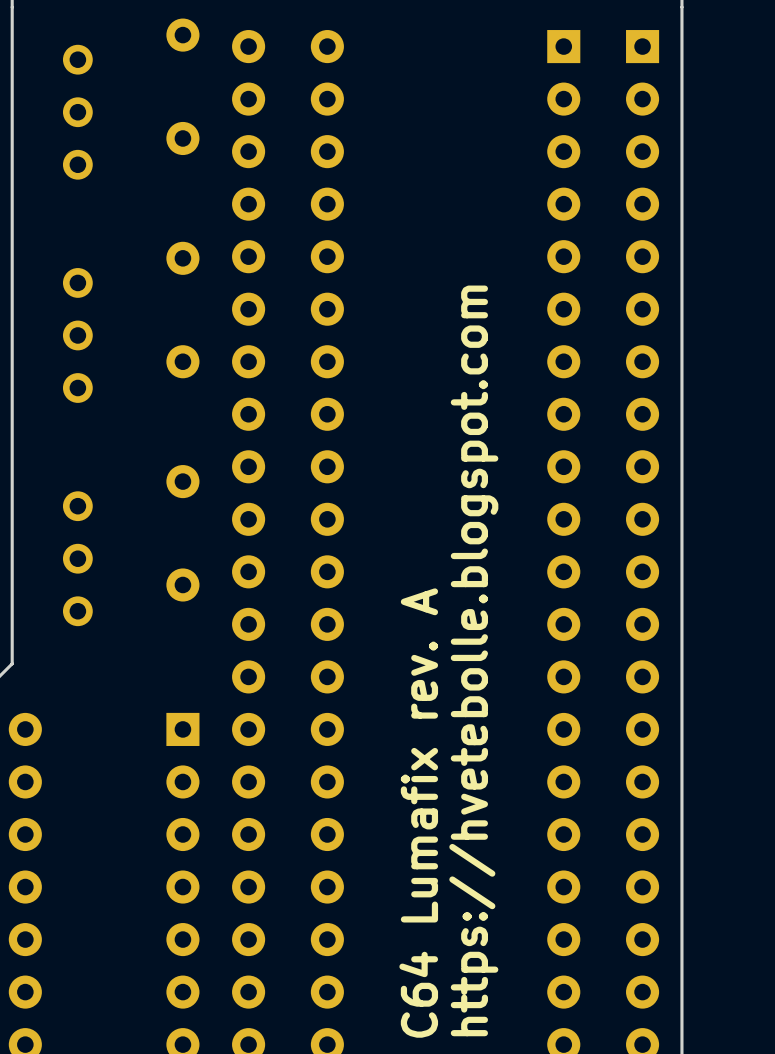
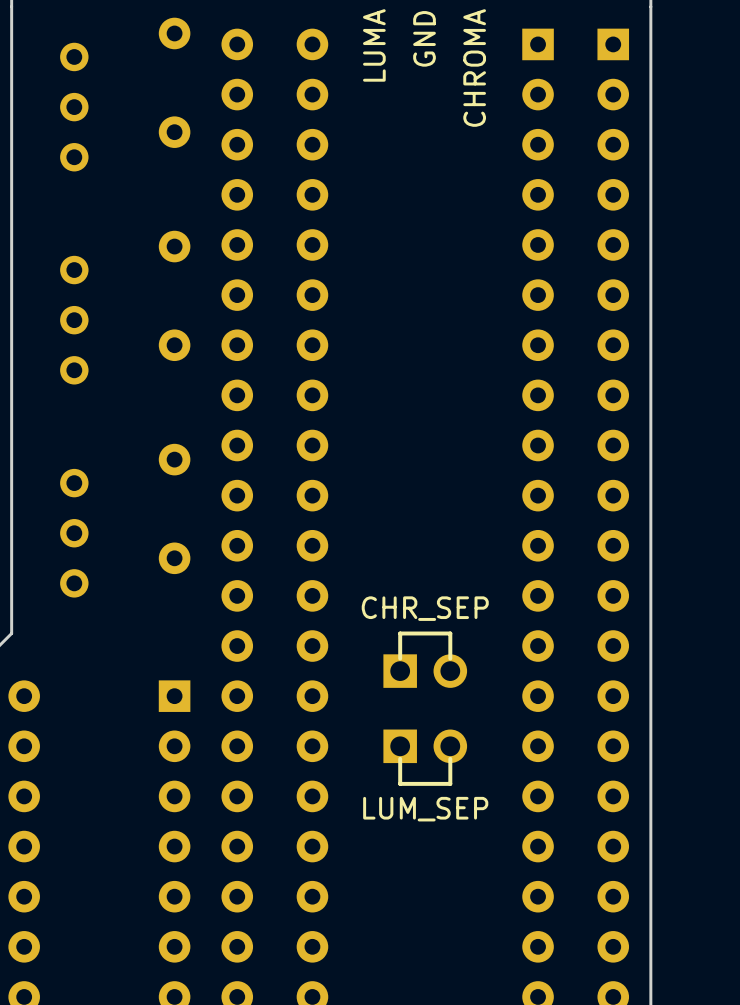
text: none -> GND (424, 38)
text: none -> LUMA (374, 45)
text: none -> CHROMA (474, 68)
text: none -> CHR_SEP (425, 608)
text: https://hvetebolle.blogspot.com (473, 660) -> none
line: none -> (450, 658) (450, 633) (400, 633) (400, 658)
part: none -> (425, 671)
part: none -> (425, 746)
line: none -> (450, 758) (450, 783) (400, 783) (400, 758)
text: C64 Lumafix rev. A (418, 813) -> none
text: none -> LUM_SEP (425, 809)

